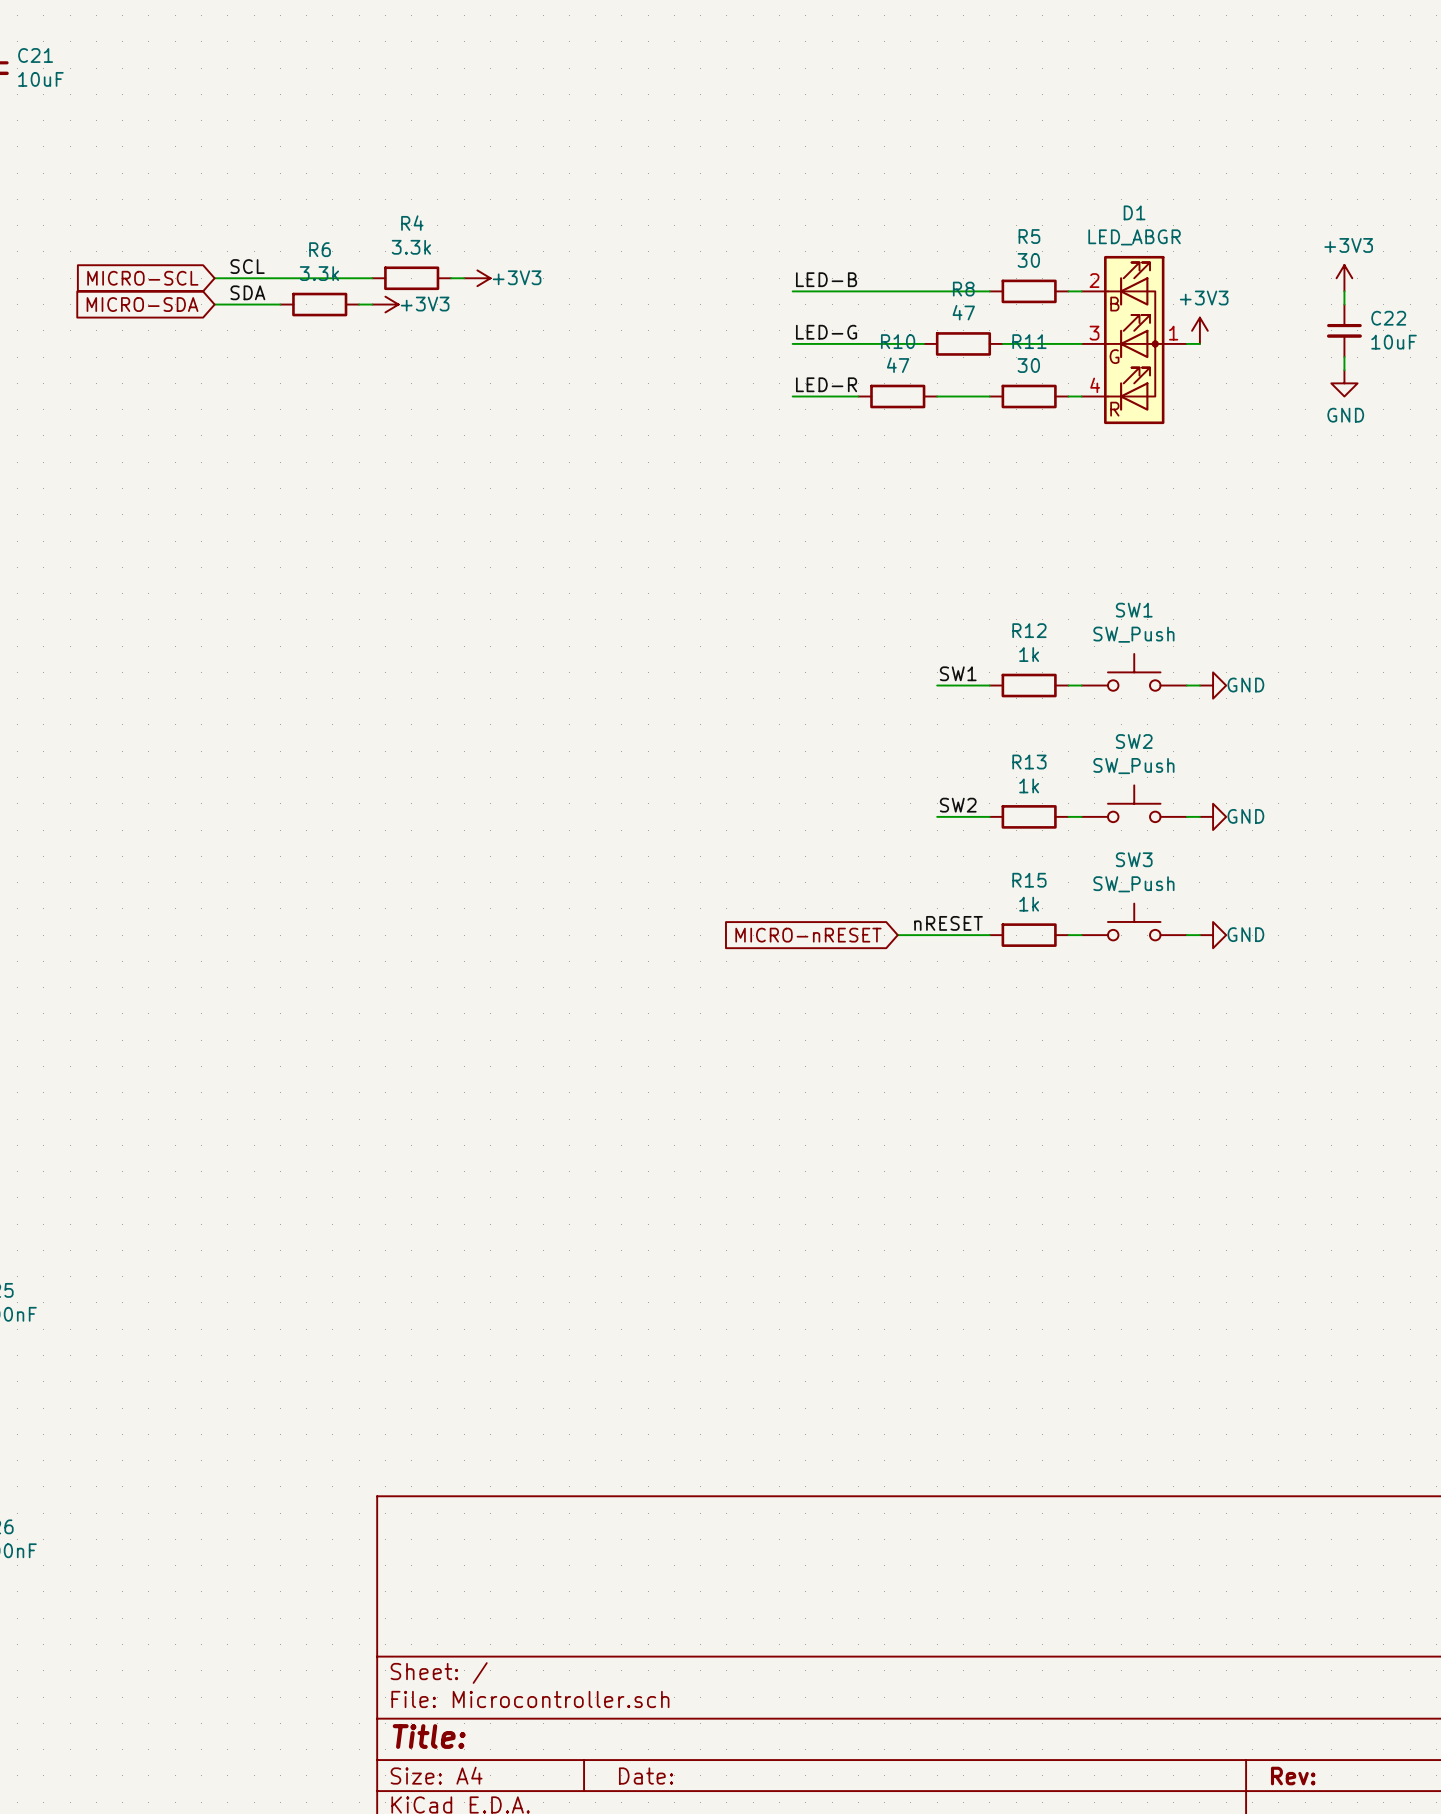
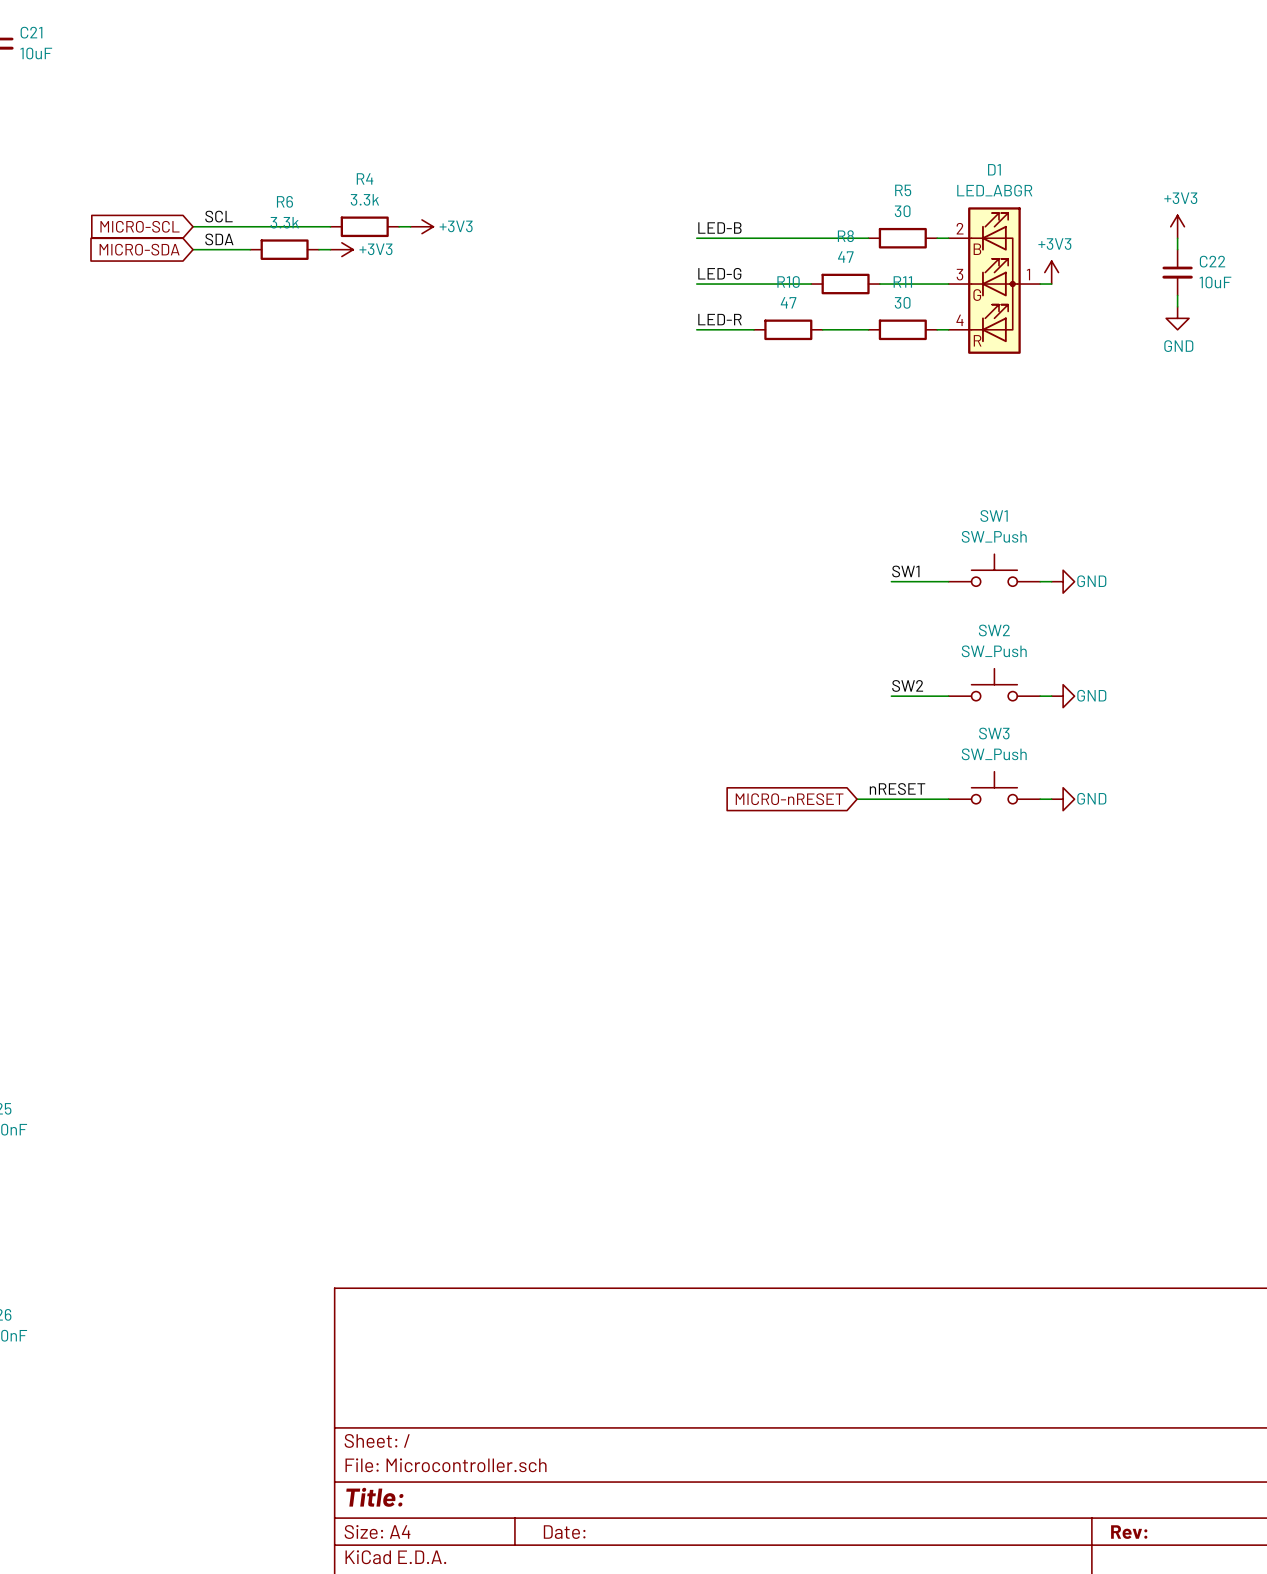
label position: SW1 (958, 673) -> SW1 (905, 571)
wire: (937, 685) (989, 685) -> (891, 581) (937, 581)
R12: 1k (1029, 685) -> none
label position: SW2 (958, 805) -> SW2 (907, 685)
wire: (937, 816) (989, 816) -> (891, 696) (937, 696)
R13: 1k (1029, 816) -> none
label position: nRESET (948, 923) -> nRESET (897, 788)
global label position: MICRO-nRESET (808, 935) -> MICRO-nRESET (789, 799)
wire: (897, 935) (976, 935) -> (868, 799) (937, 799)
R15: 1k (1029, 935) -> none

